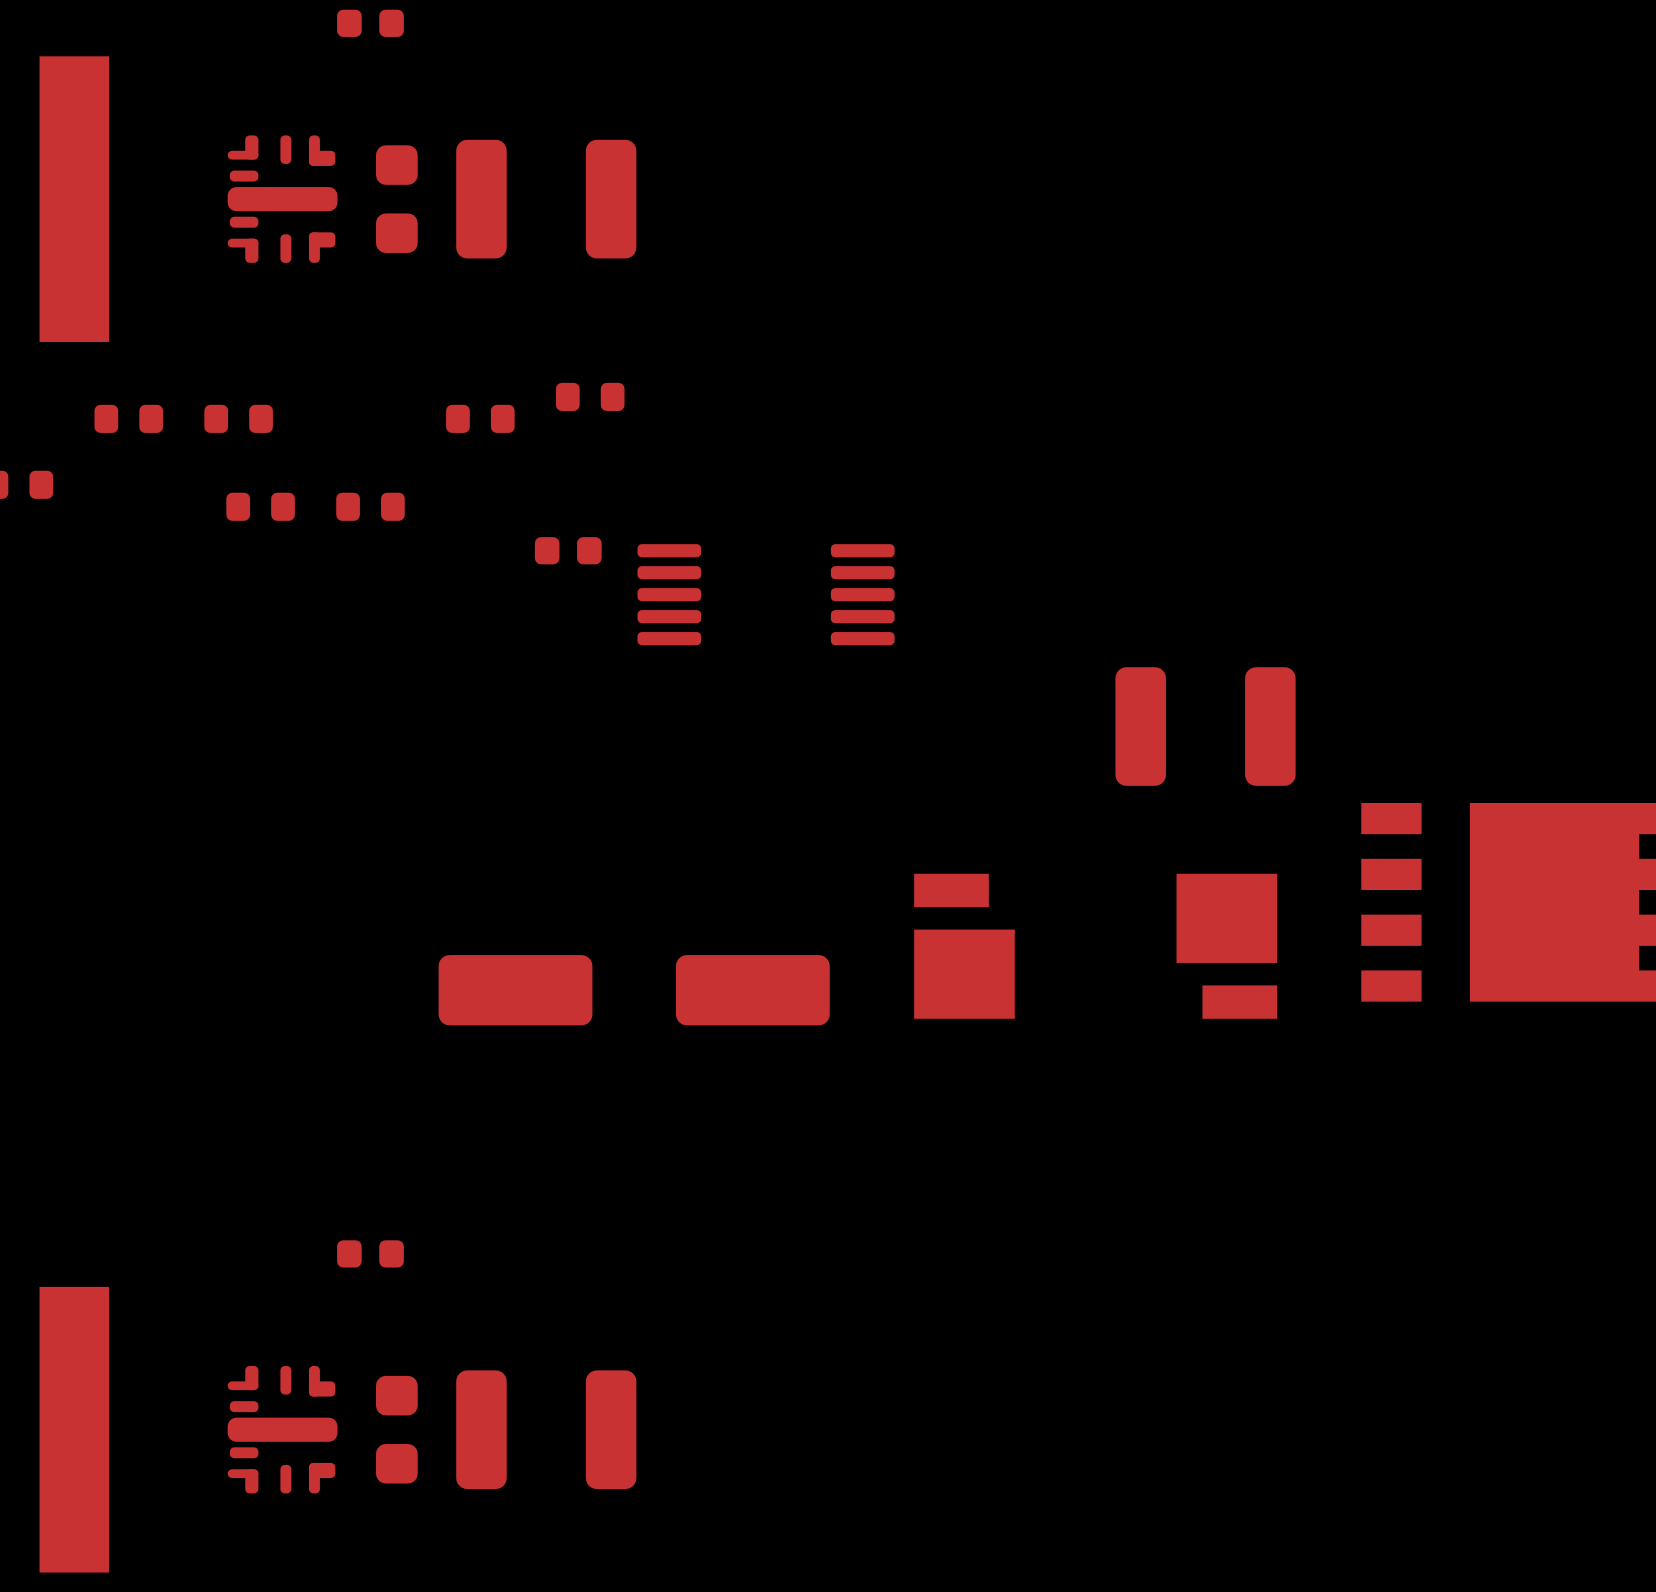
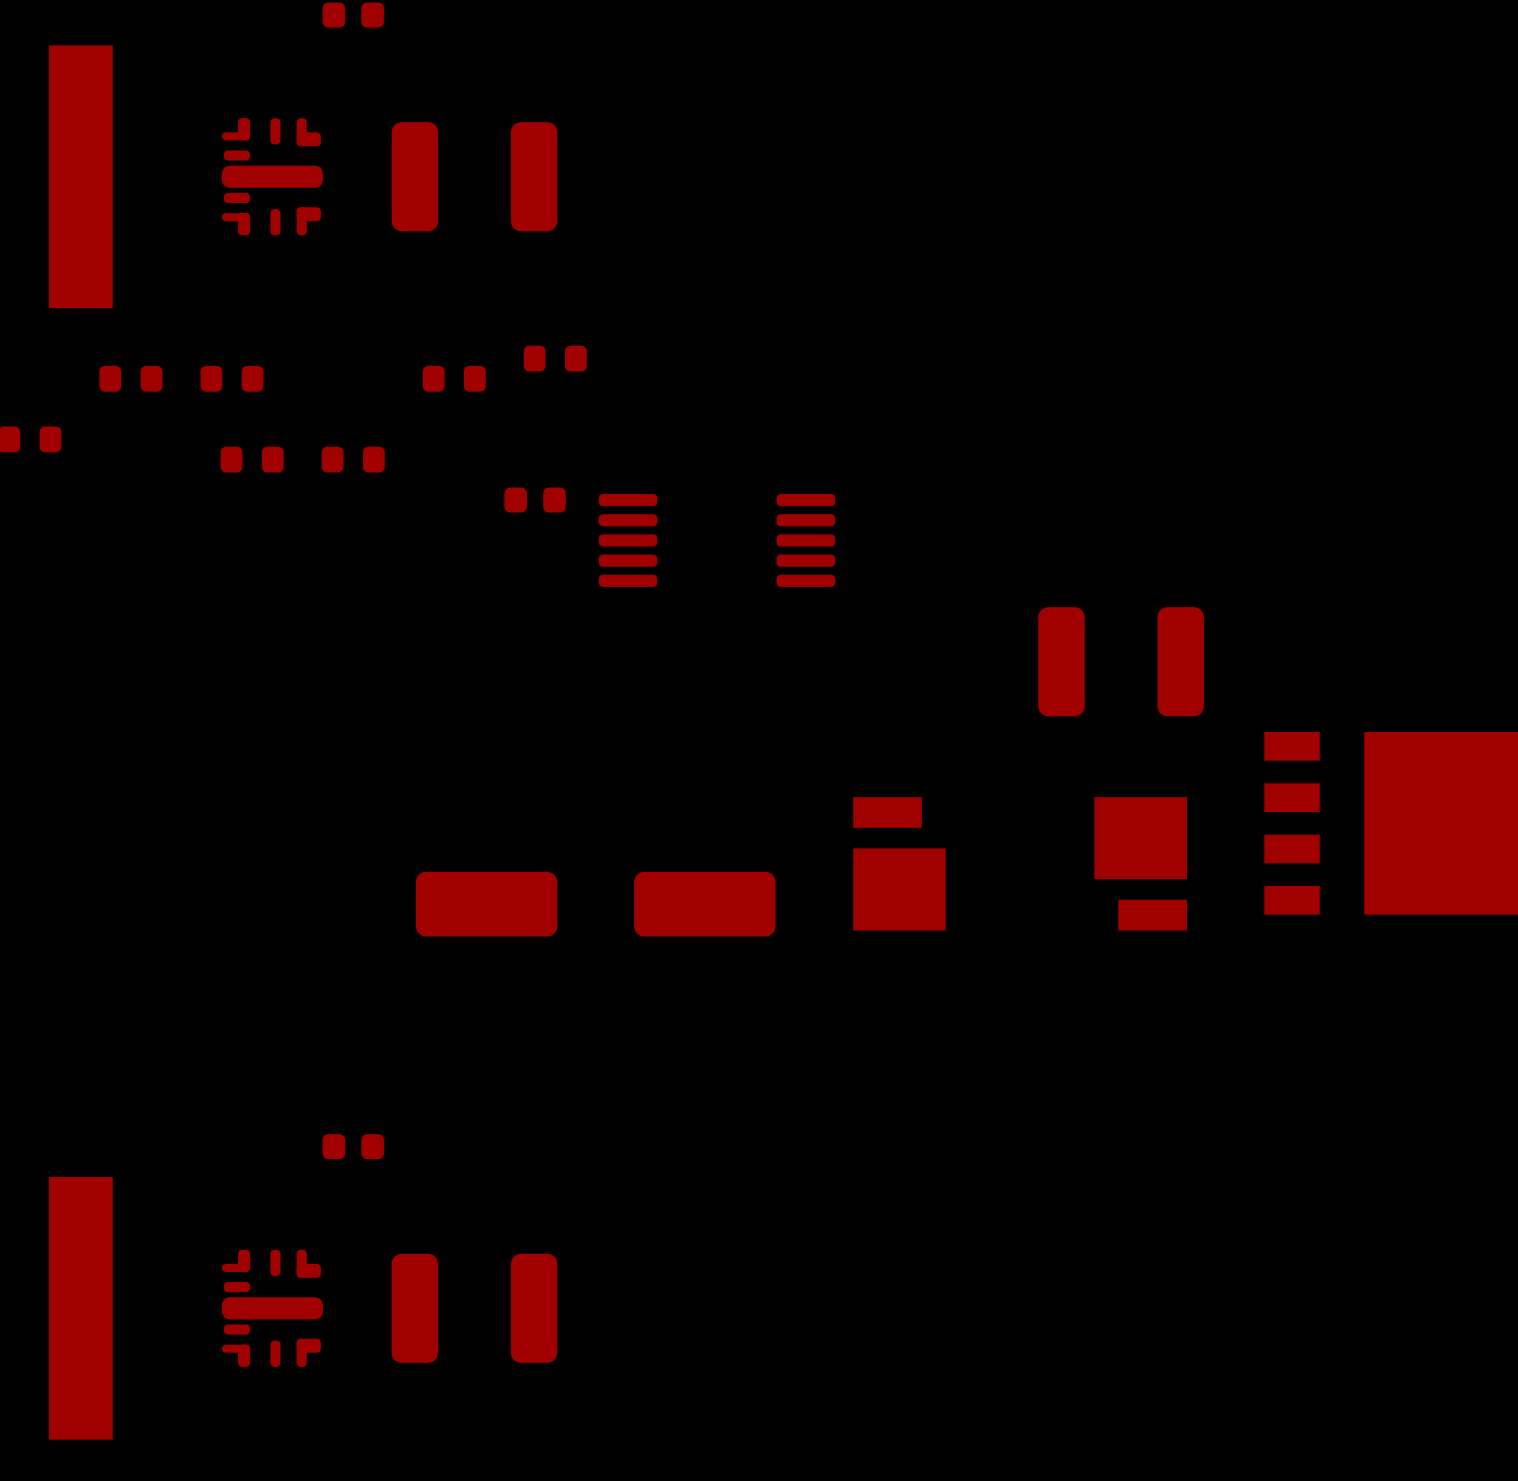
part: (396, 199) -> none
part position: (546, 199) -> (474, 176)
part: (396, 1429) -> none
part position: (546, 1429) -> (474, 1308)

